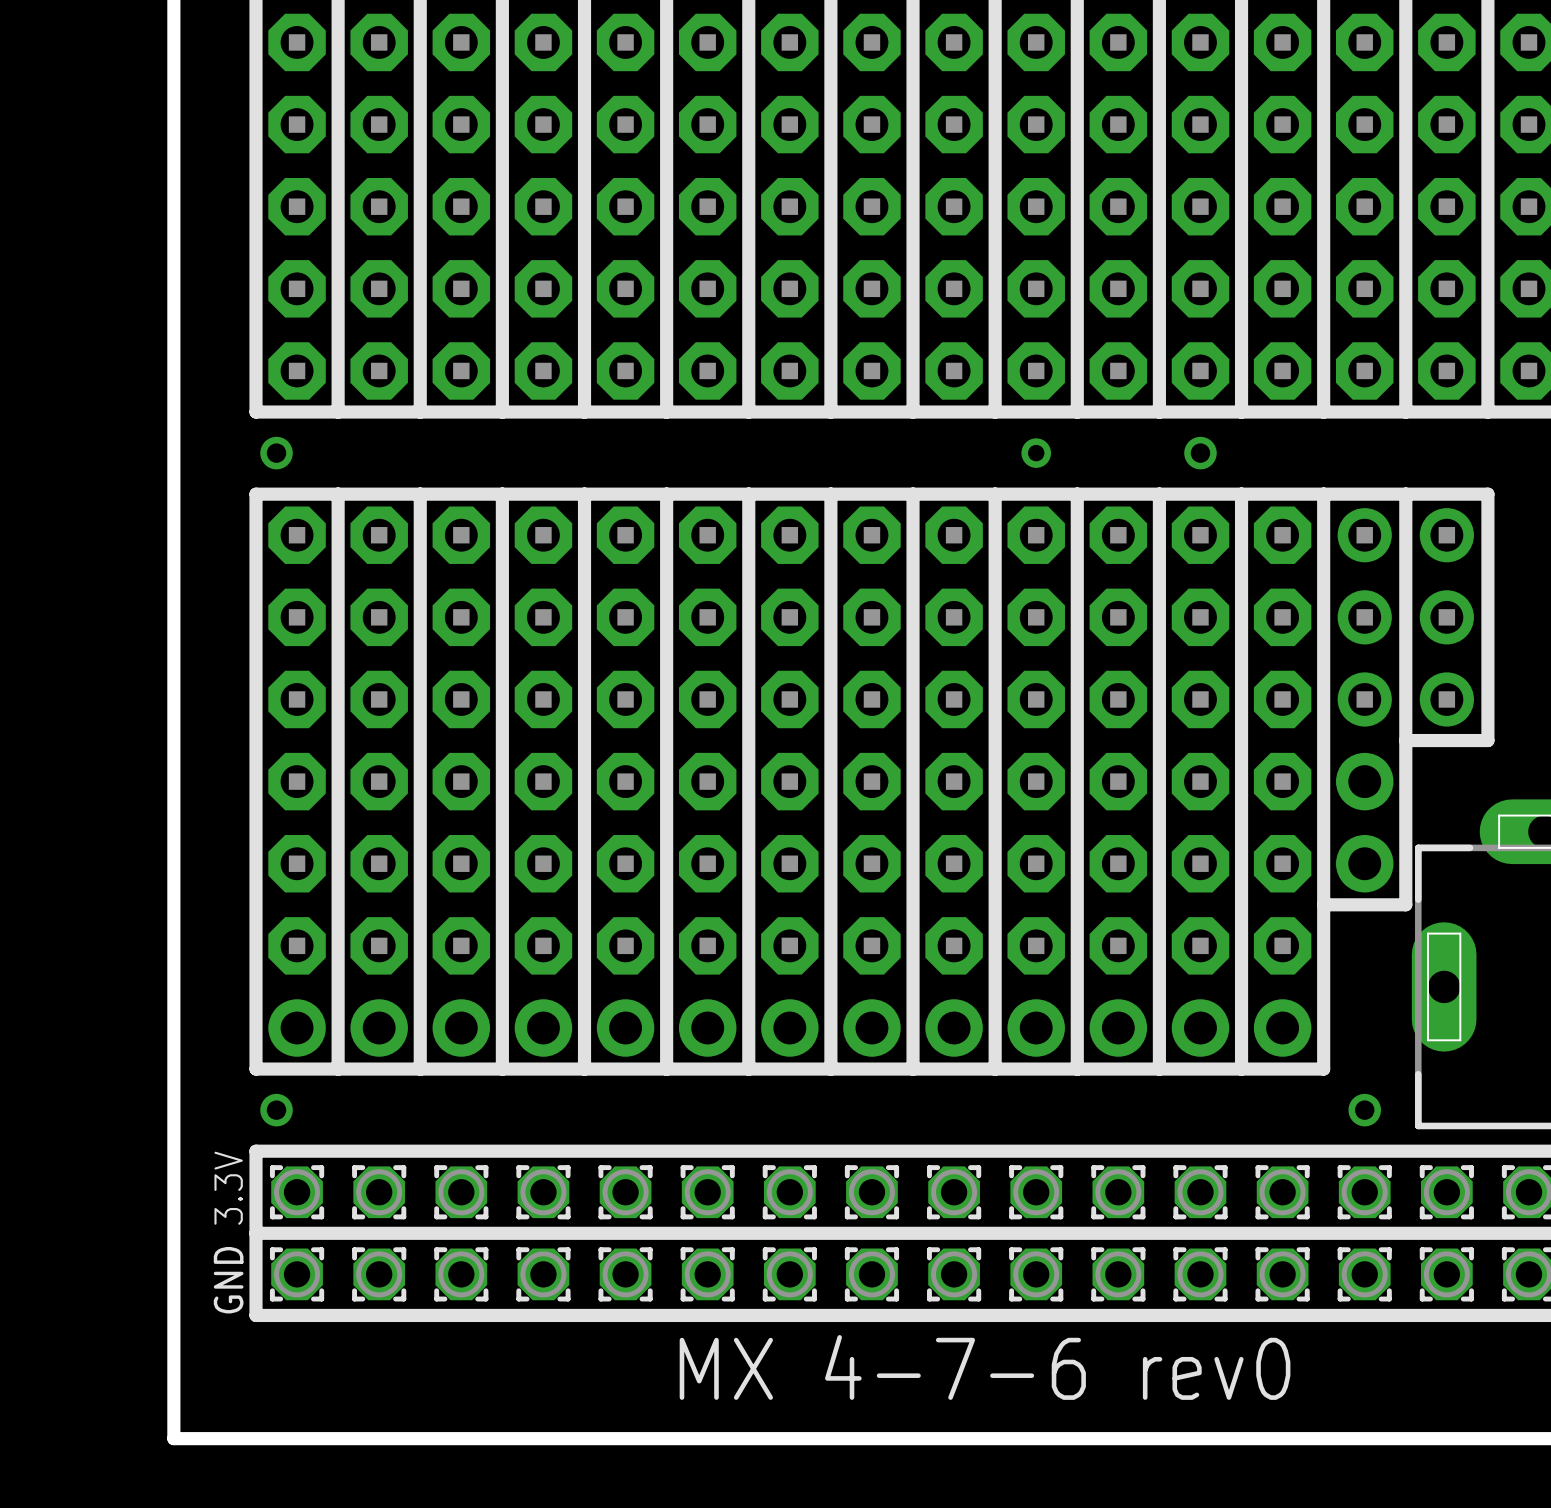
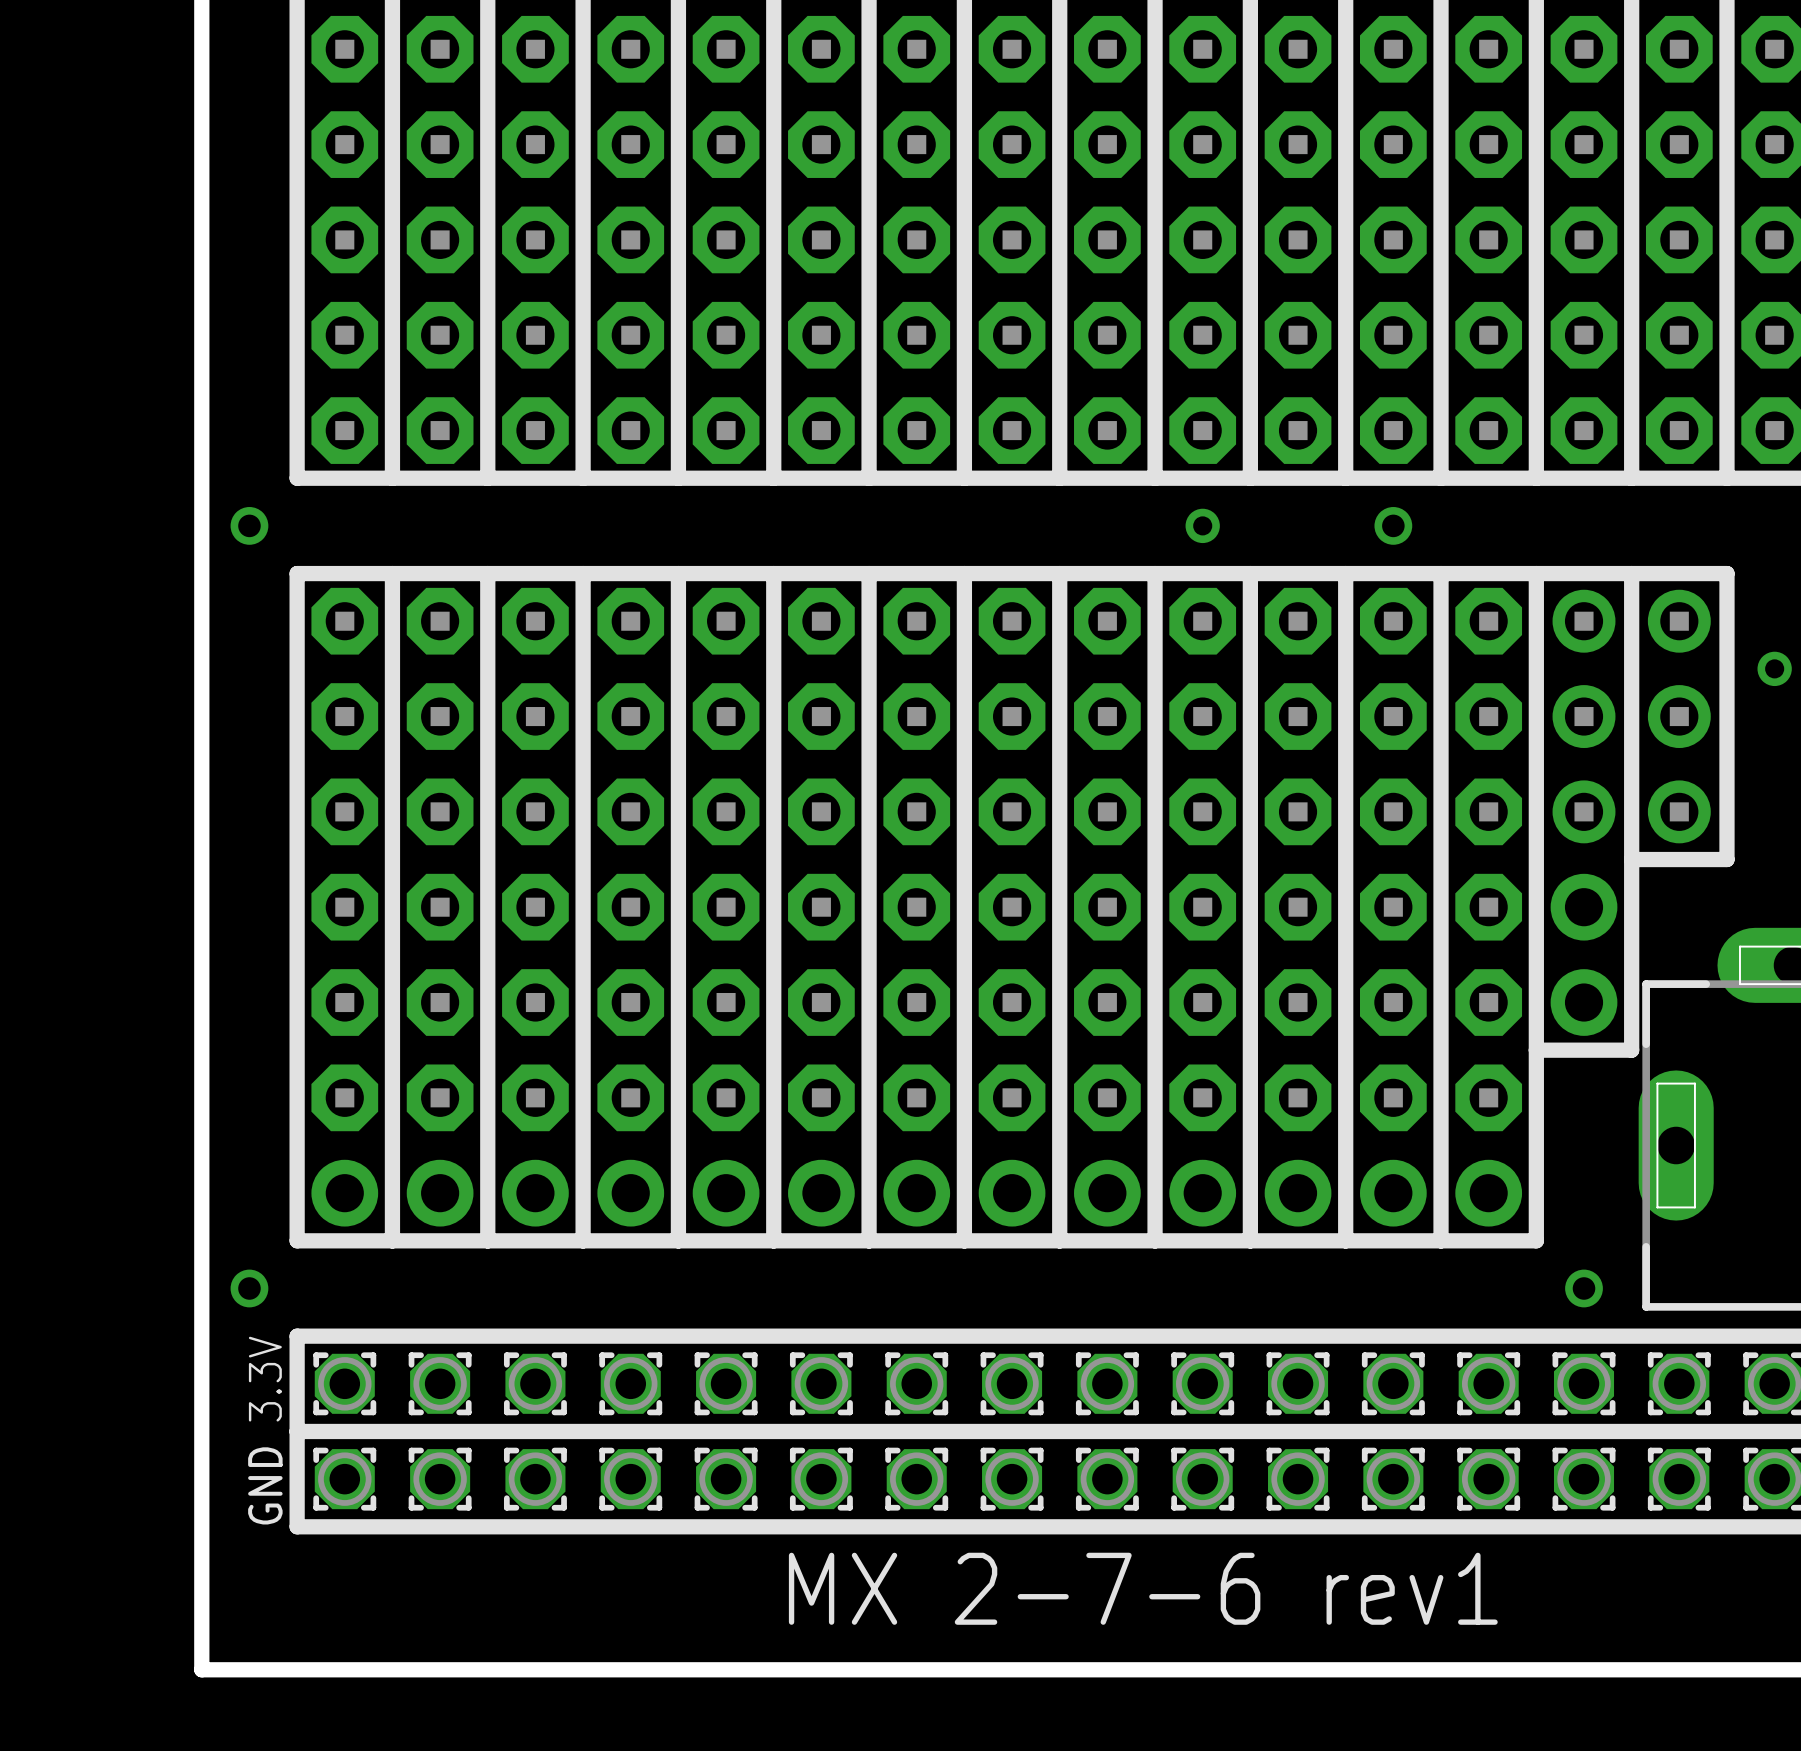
via position: (276, 453) -> (249, 525)
via: none -> (1774, 668)
via position: (276, 1110) -> (249, 1288)
text: MX 4-7-6 rev0 (985, 1367) -> MX 2-7-6 rev1 (1143, 1588)

